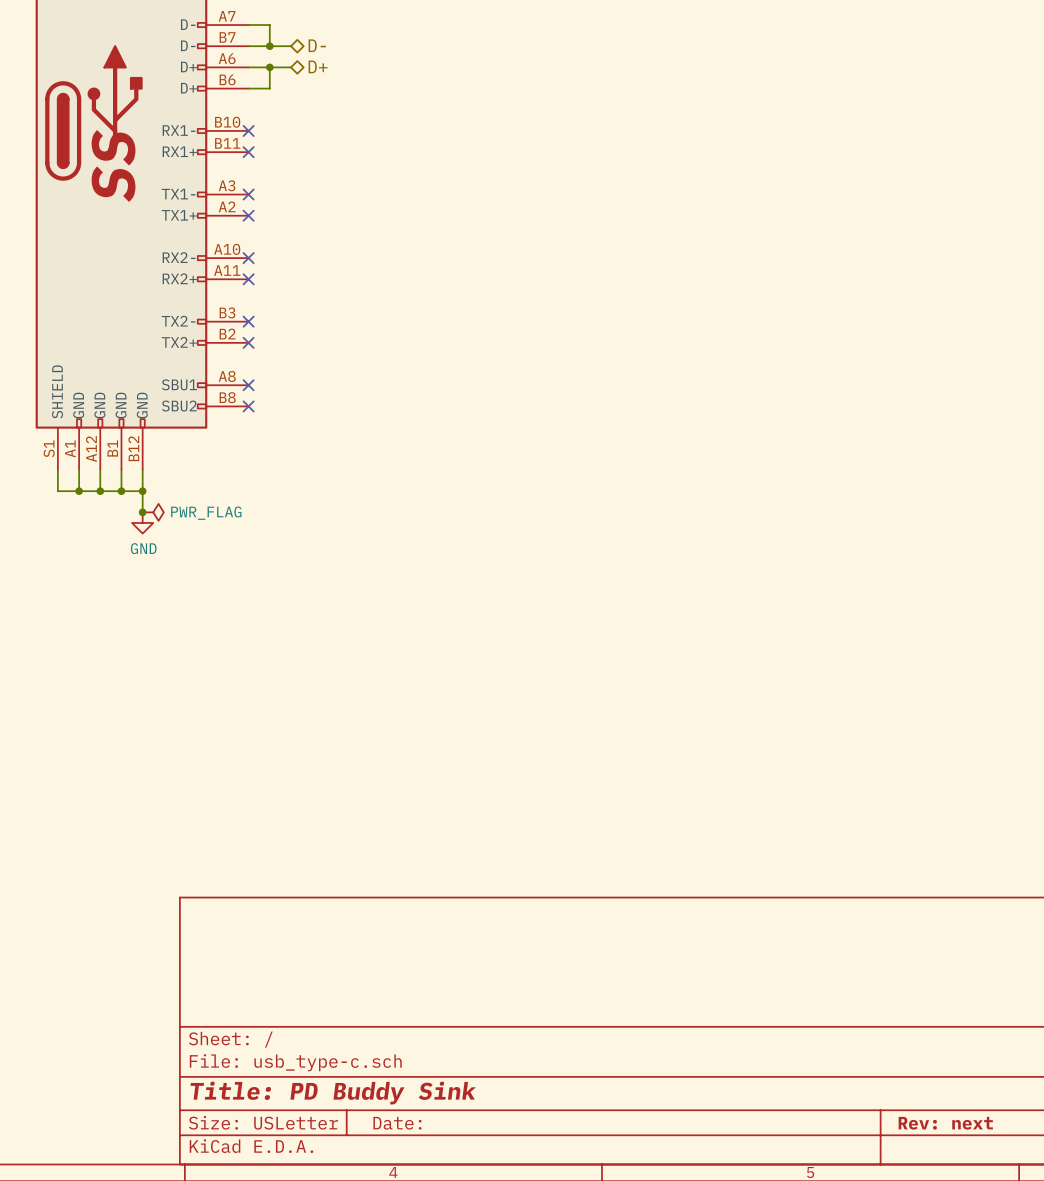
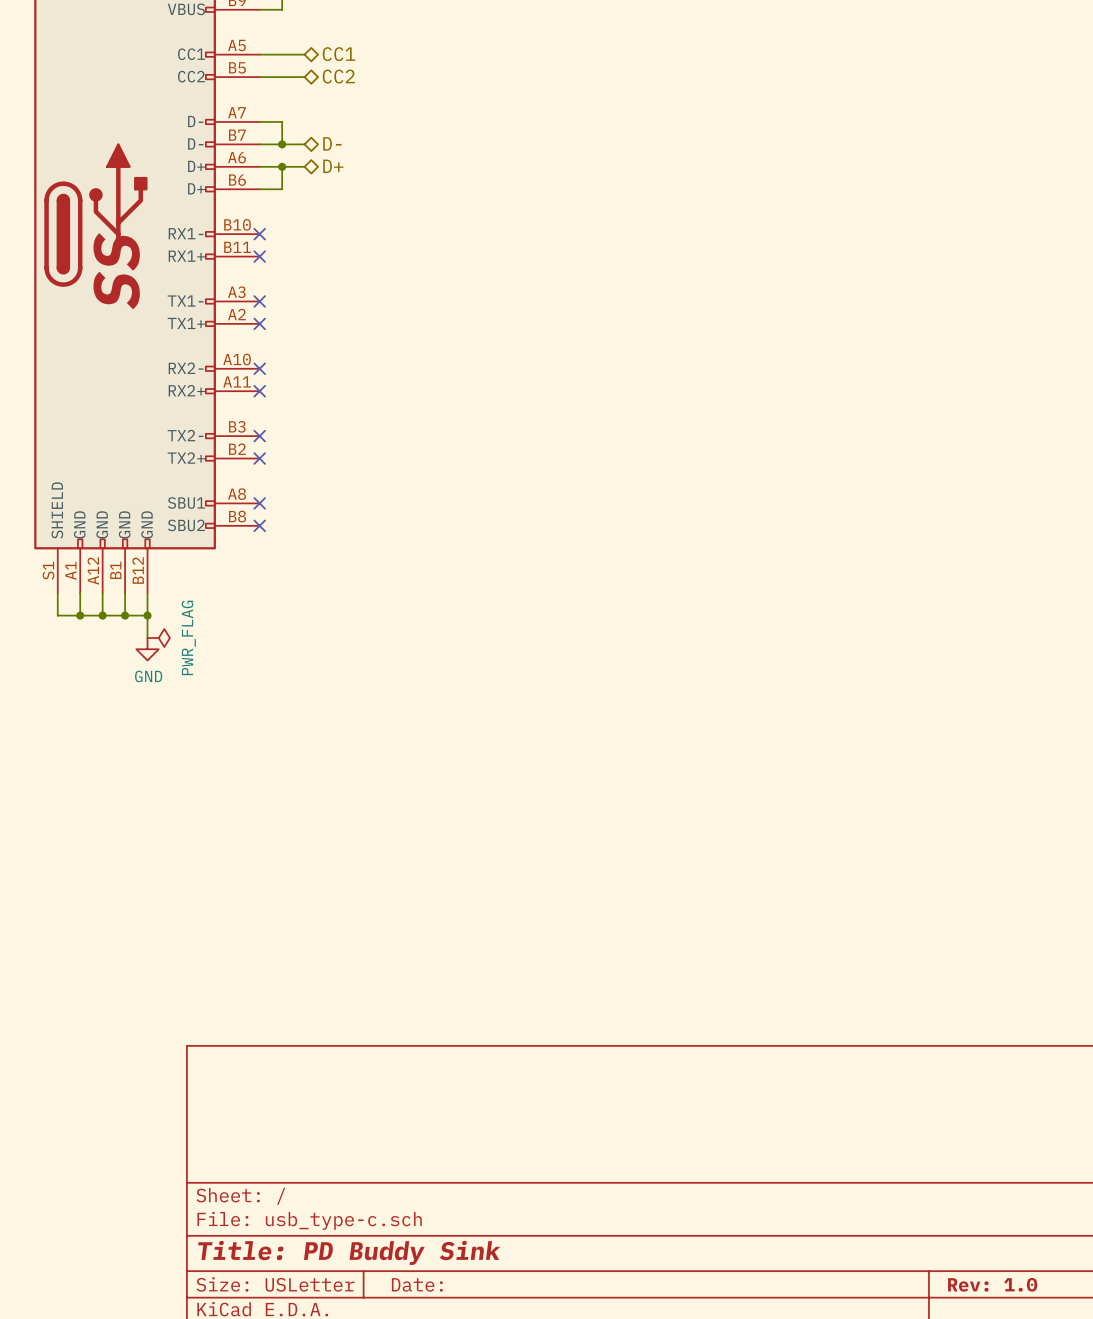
junction: (142, 512) -> none
power symbol text rotation: 0° (206, 513) -> 90° counterclockwise (188, 637)
title block: Rev: next (945, 1123) -> Rev: 1.0 (992, 1284)

